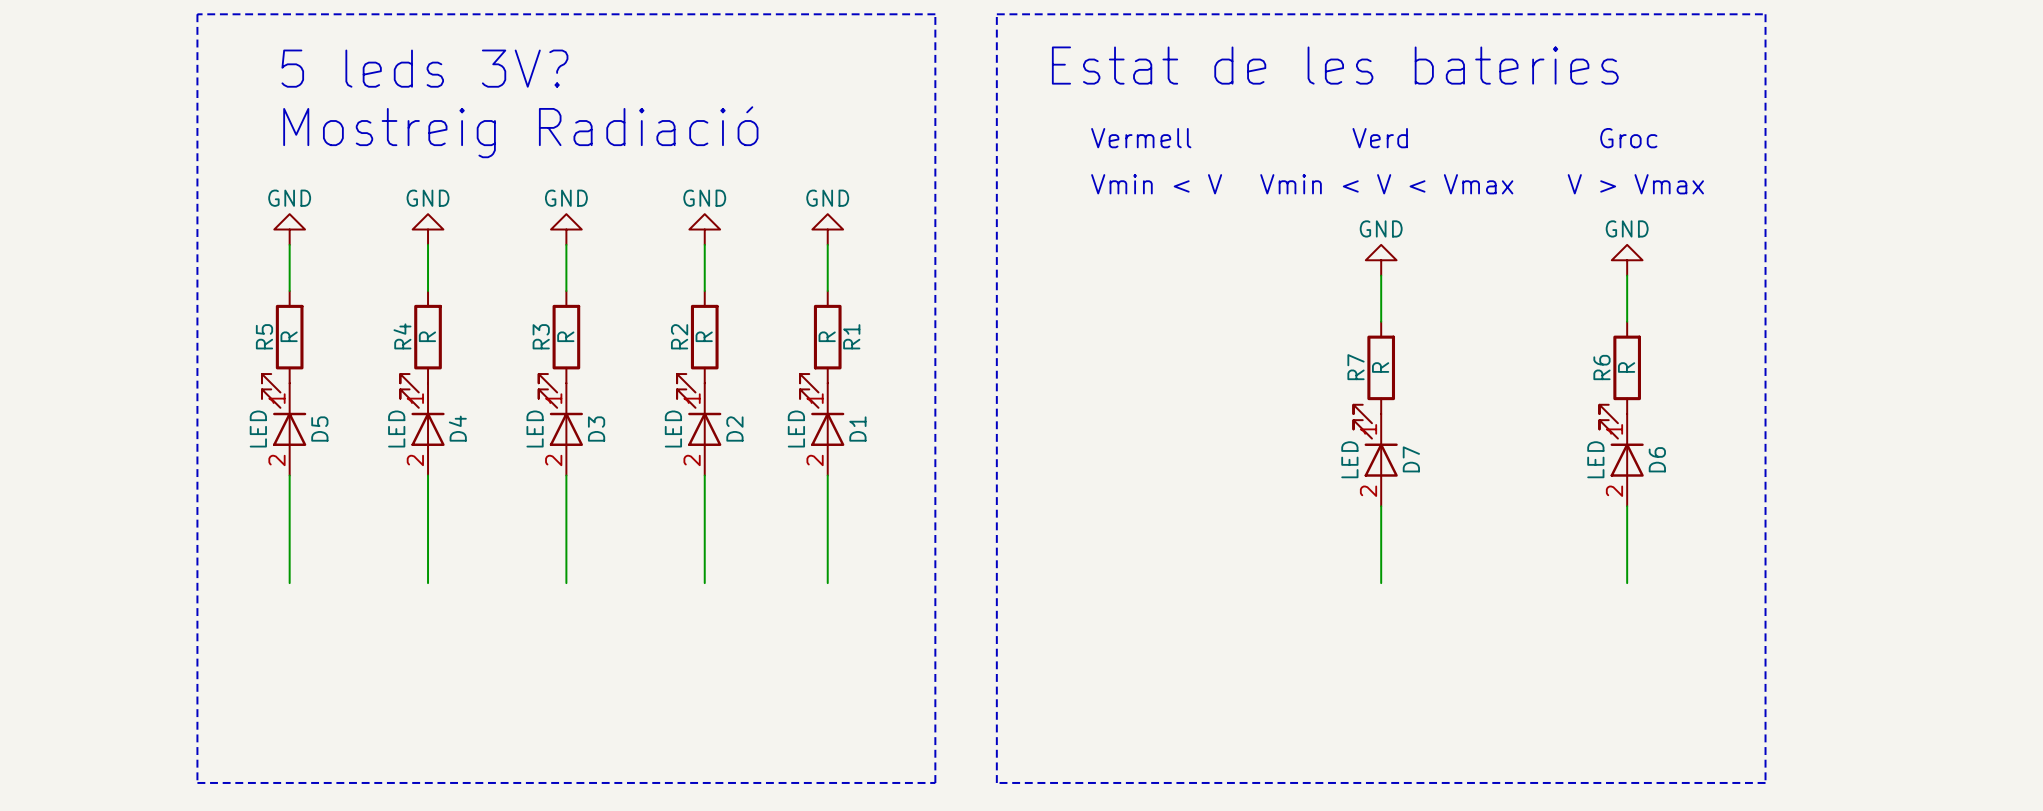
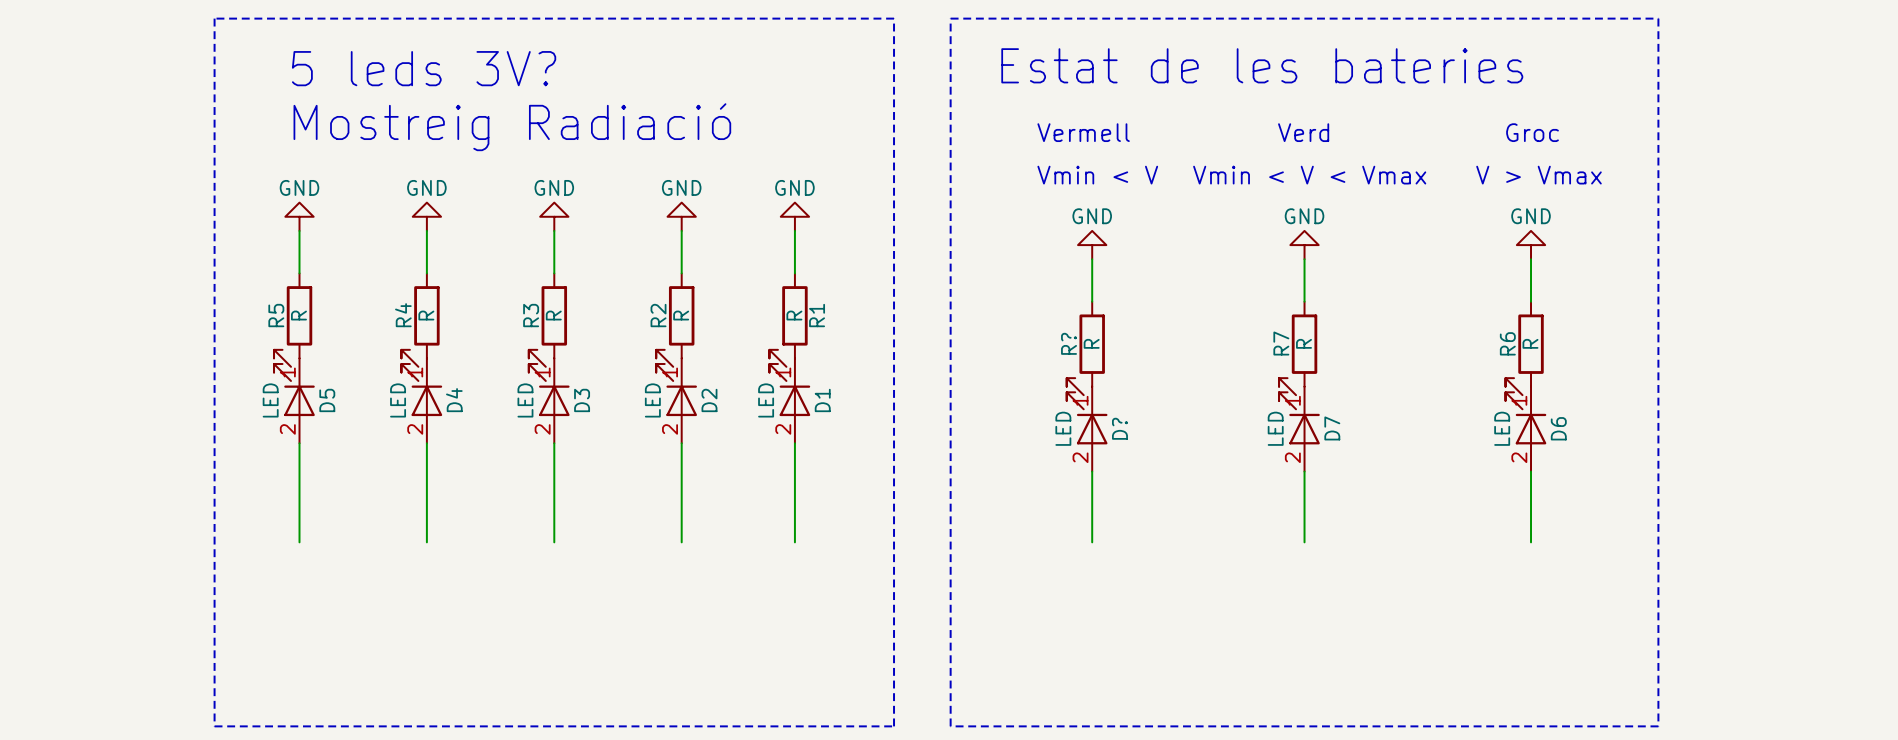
power symbol: none -> GND (1092, 245)
wire: none -> (1092, 259) (1092, 301)
R?: none -> R (1092, 344)
D?: none -> LED (1087, 424)
wire: none -> (1092, 471) (1092, 542)

